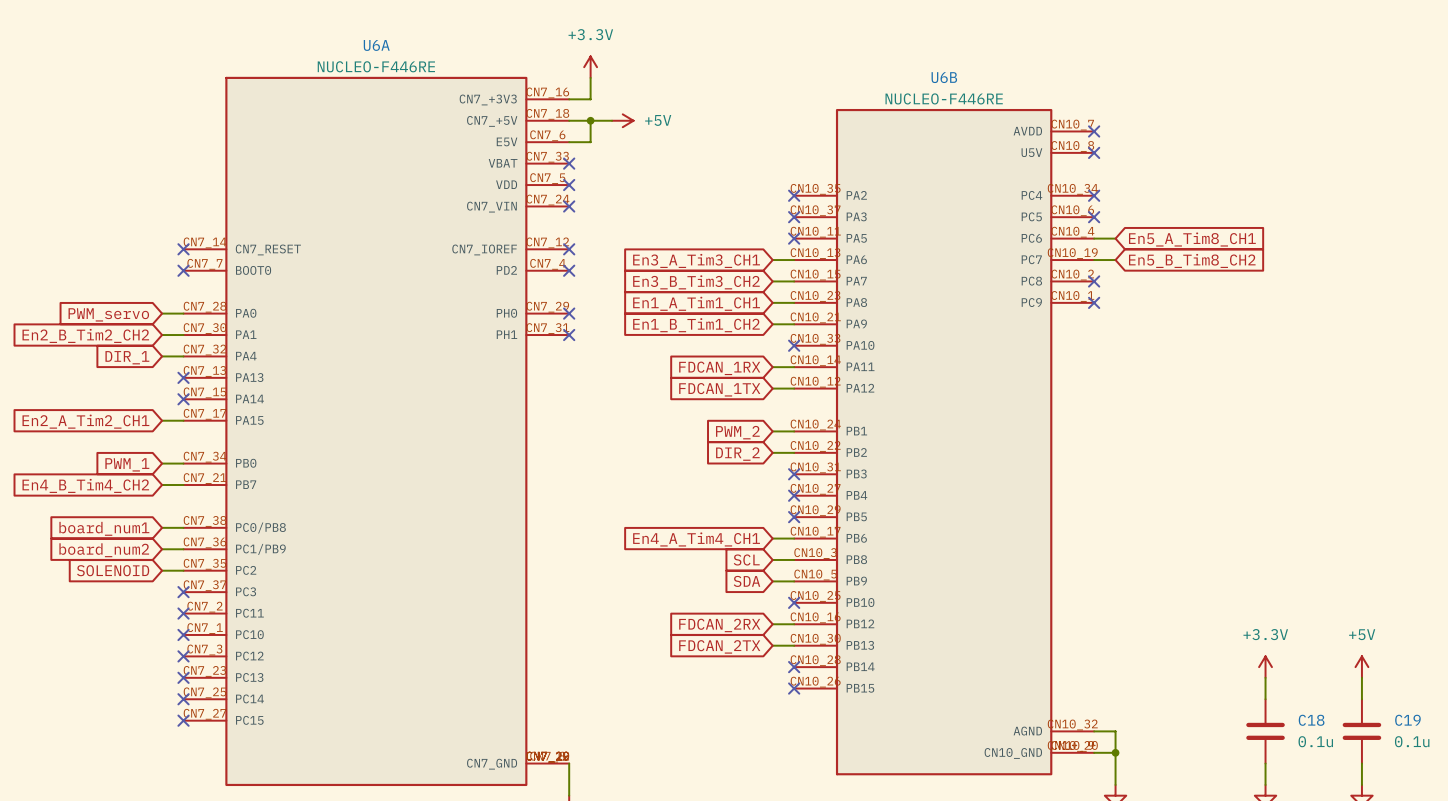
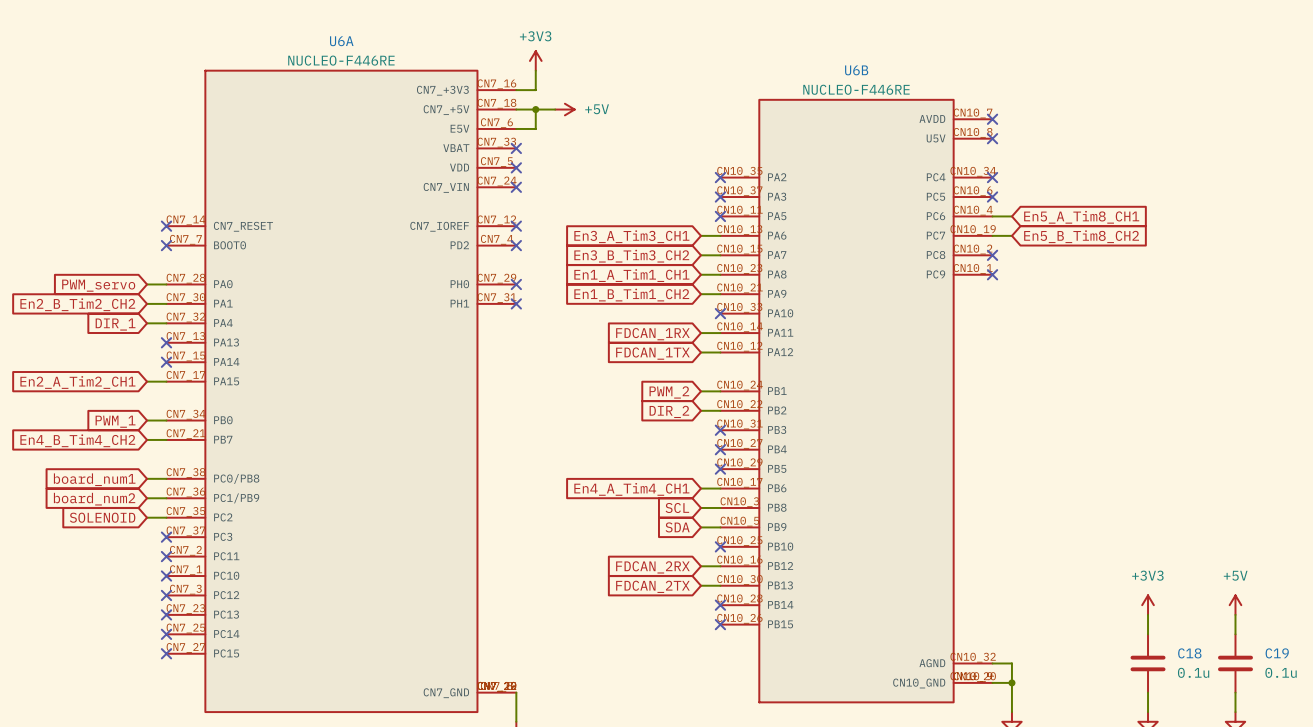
power symbol: +3.3V (590, 67) -> +3V3 (535, 60)
power symbol: +3.3V (1265, 667) -> +3V3 (1148, 605)

